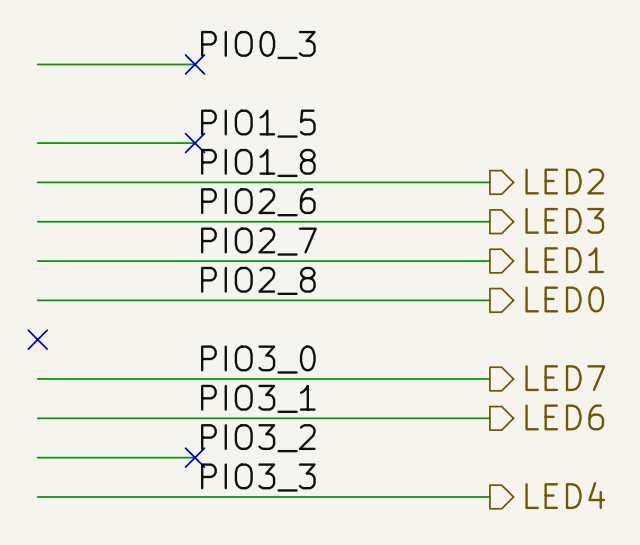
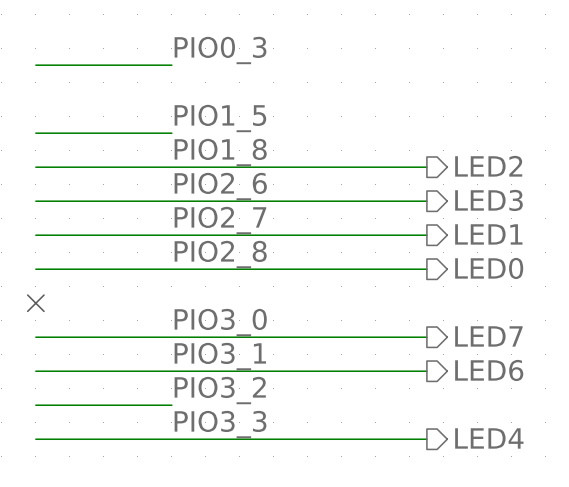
no-connect mark: (195, 64) -> none
no-connect mark: (195, 143) -> none
no-connect mark: (195, 457) -> none

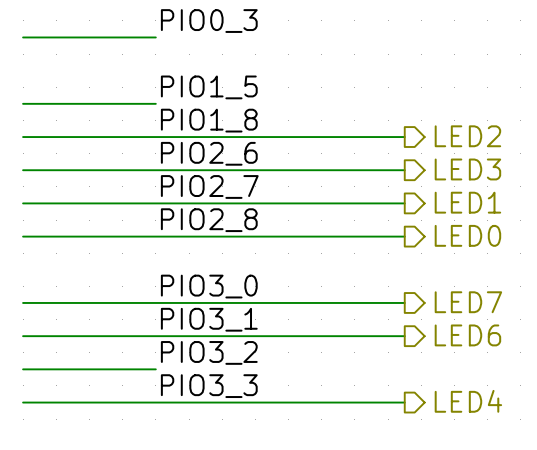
no-connect mark: (35, 303) -> none

